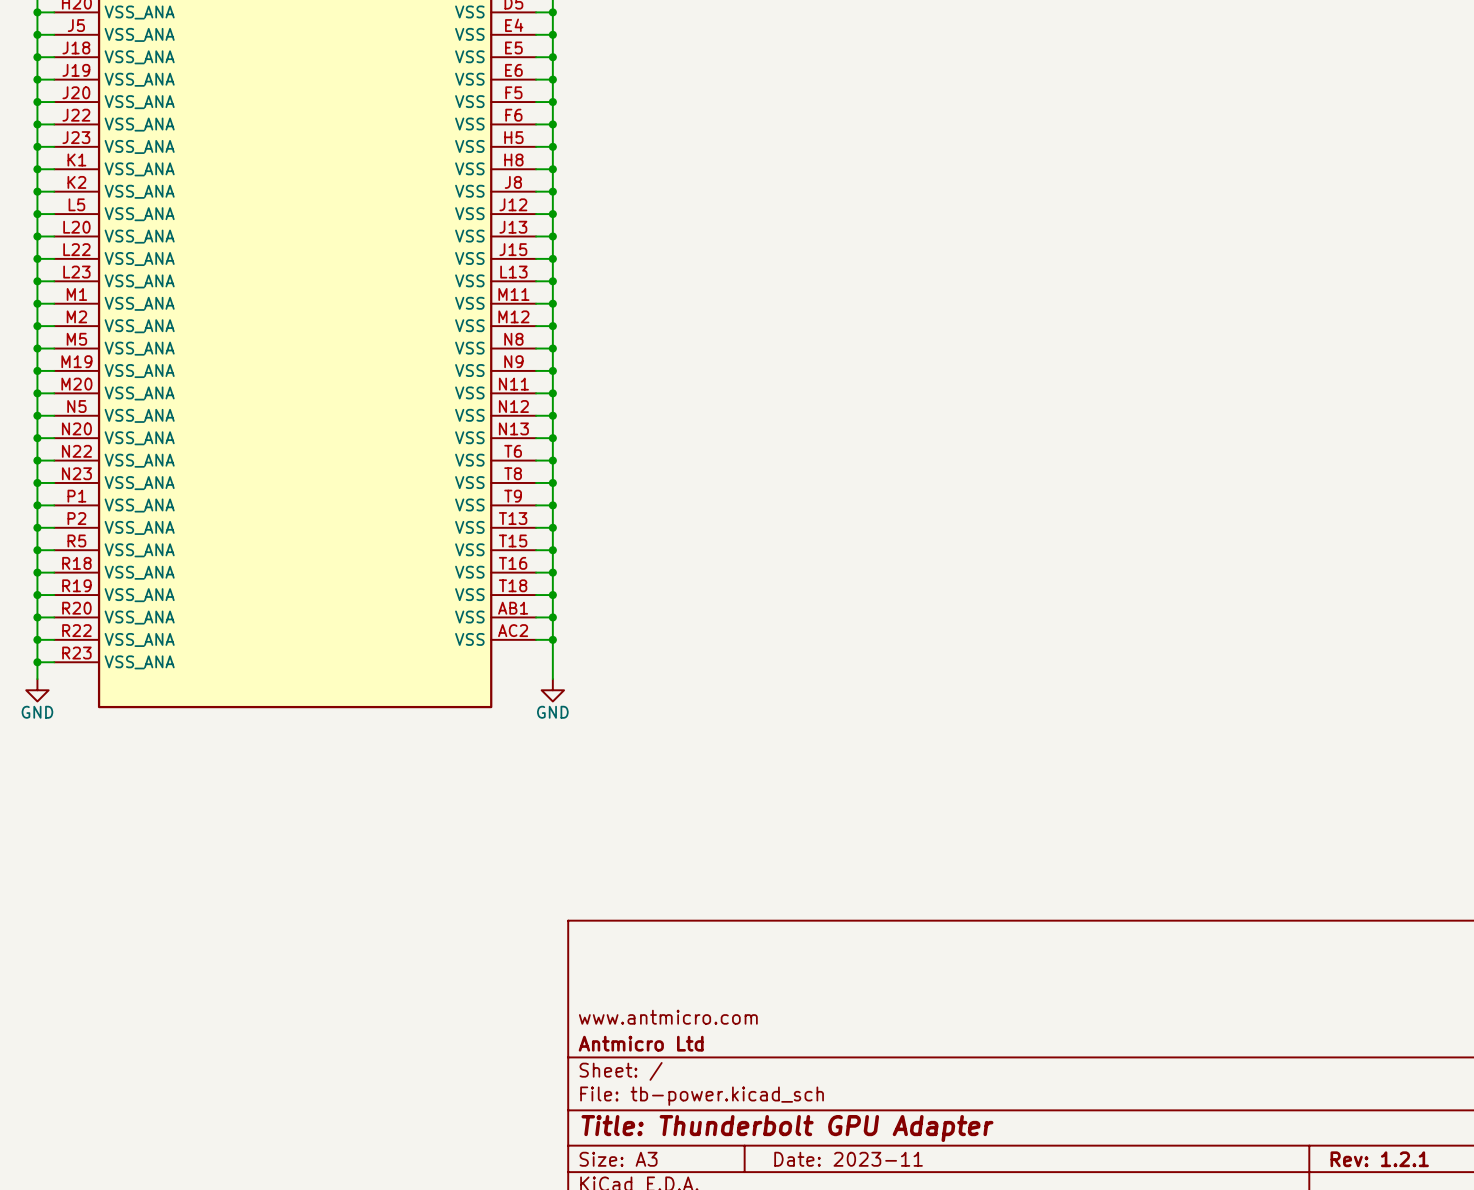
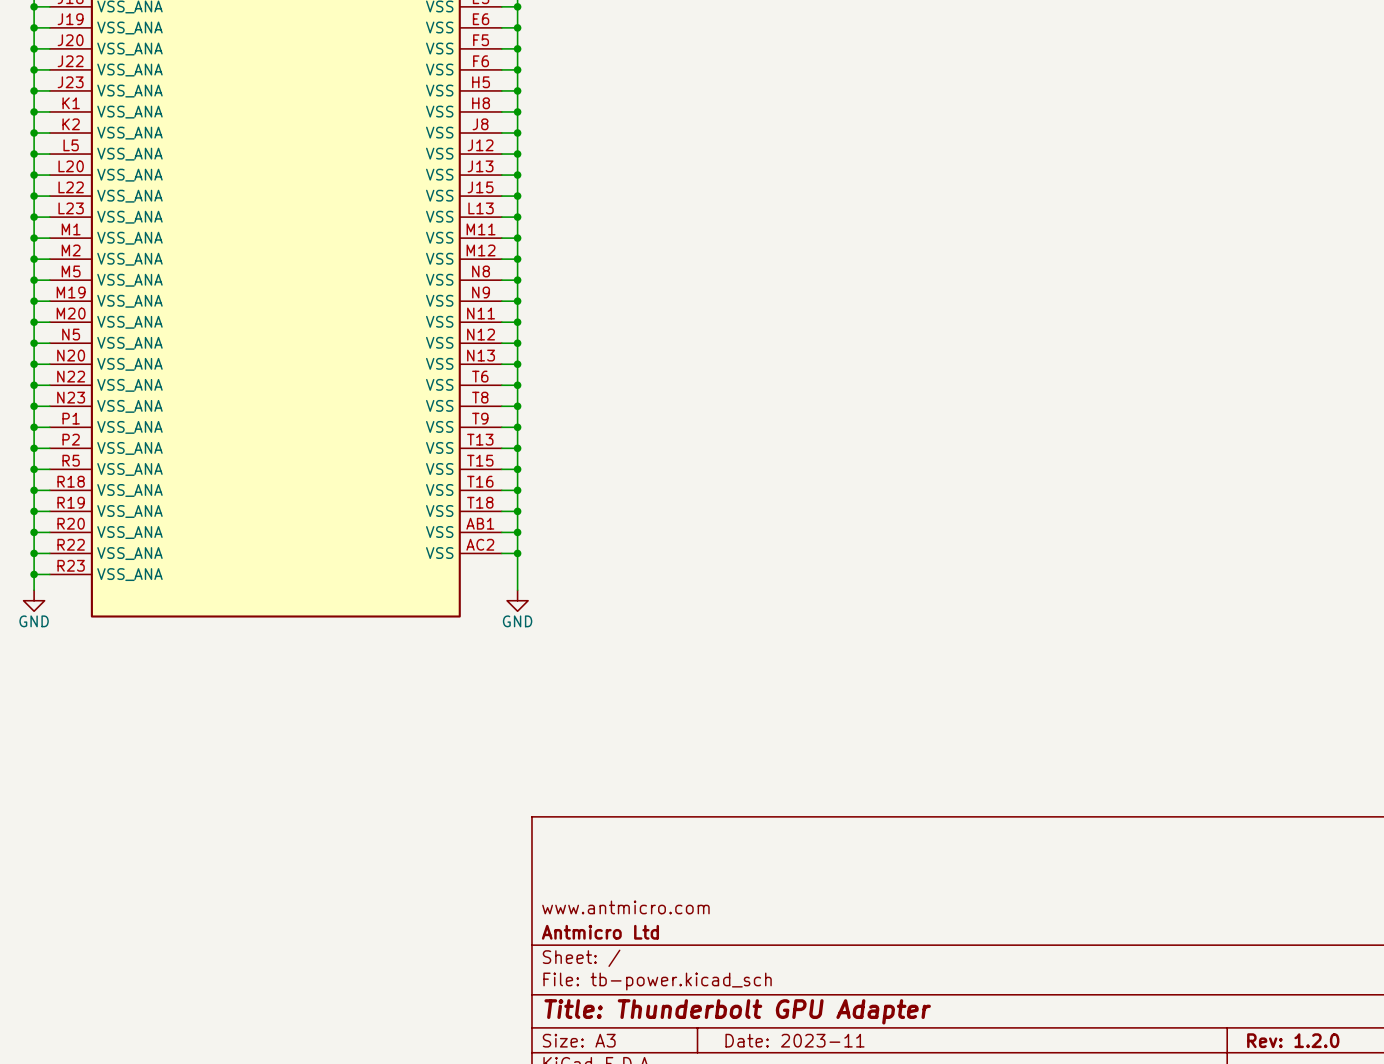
title block: Rev: 1.2.1 (1379, 1159) -> Rev: 1.2.0 (1293, 1040)

